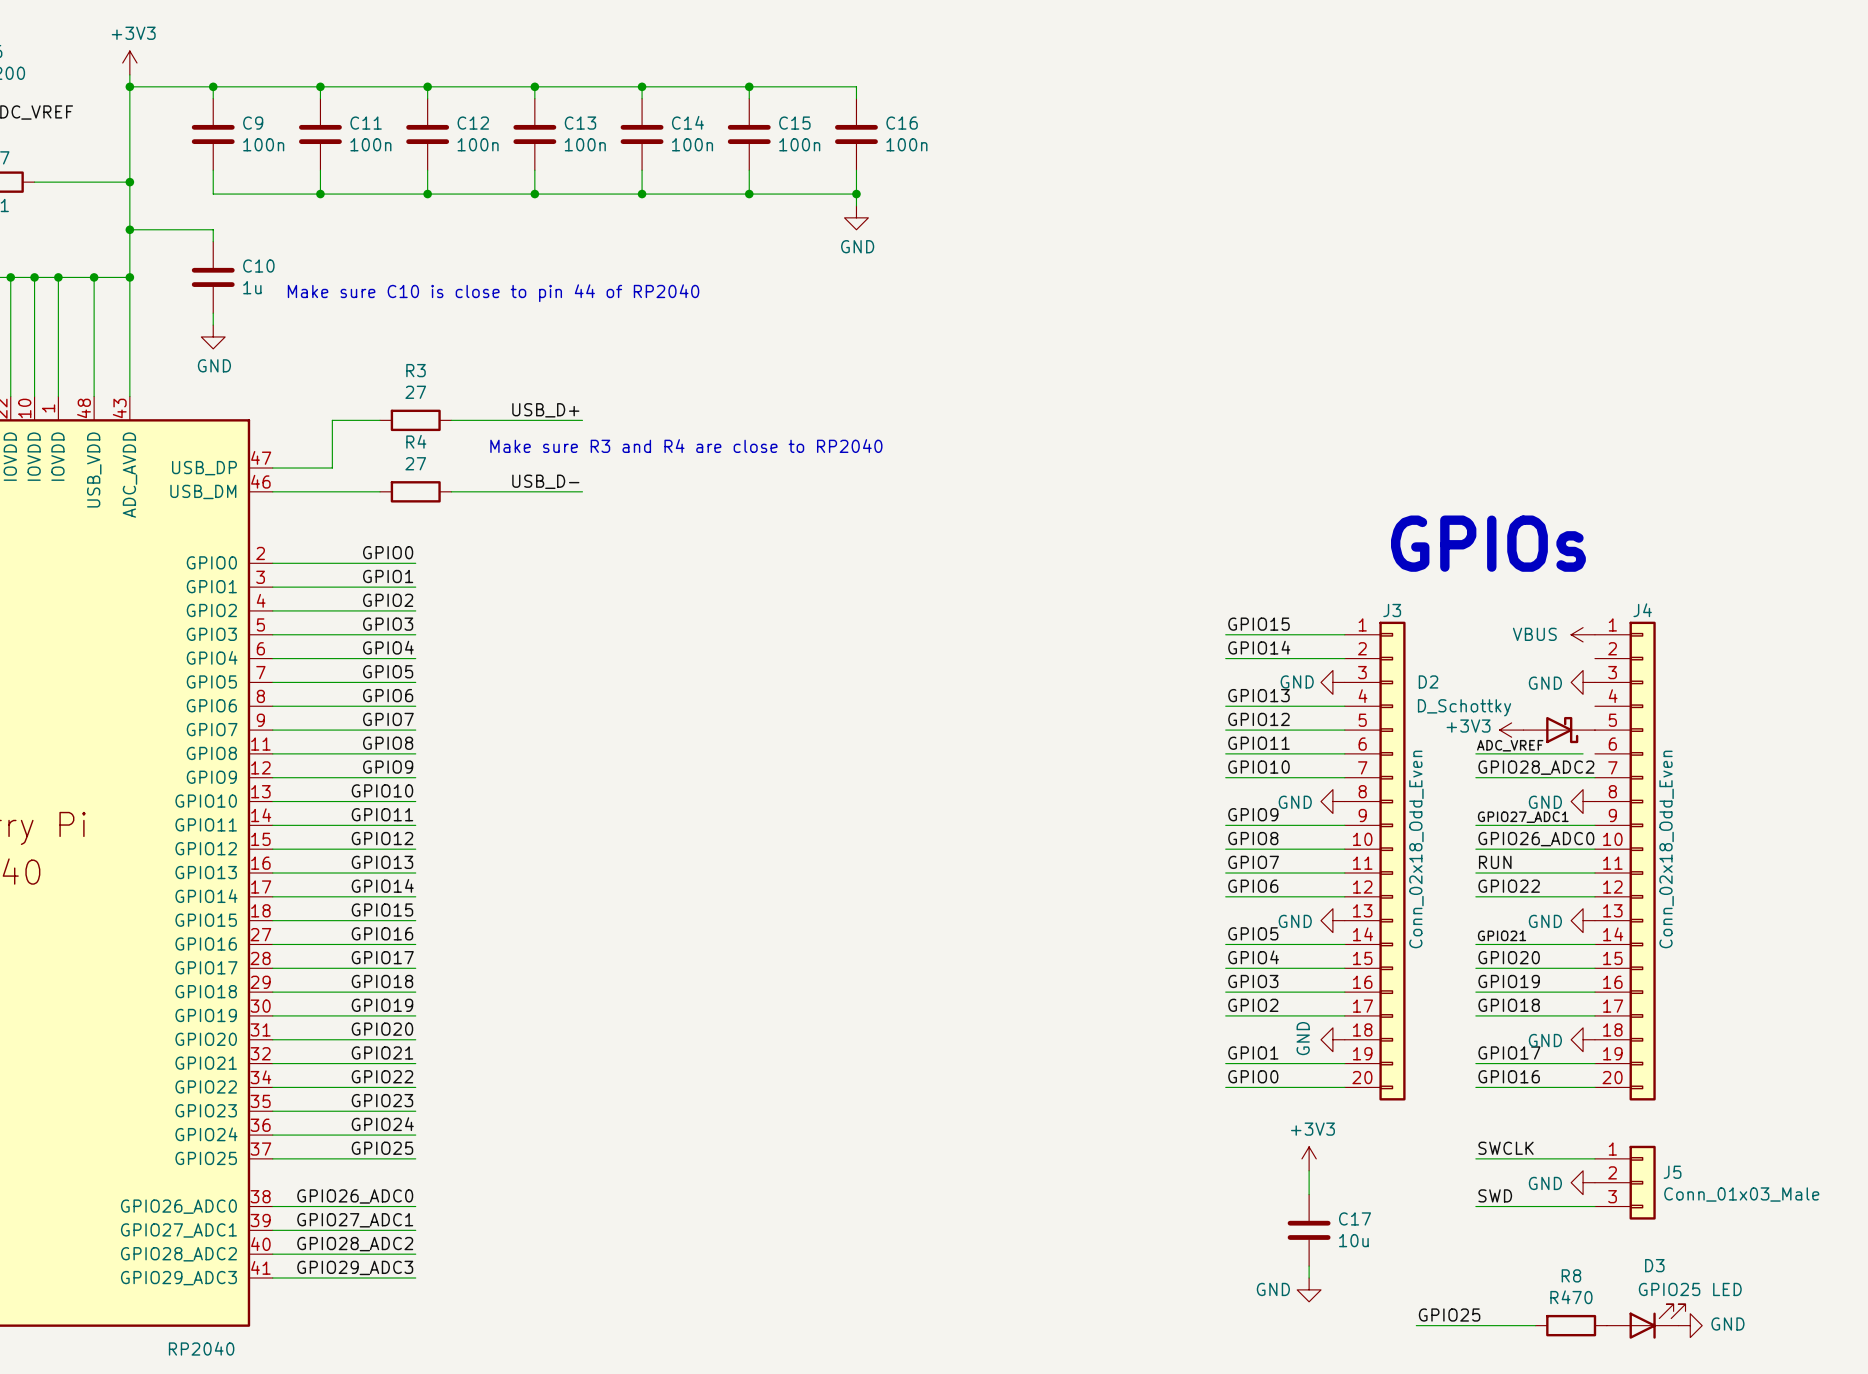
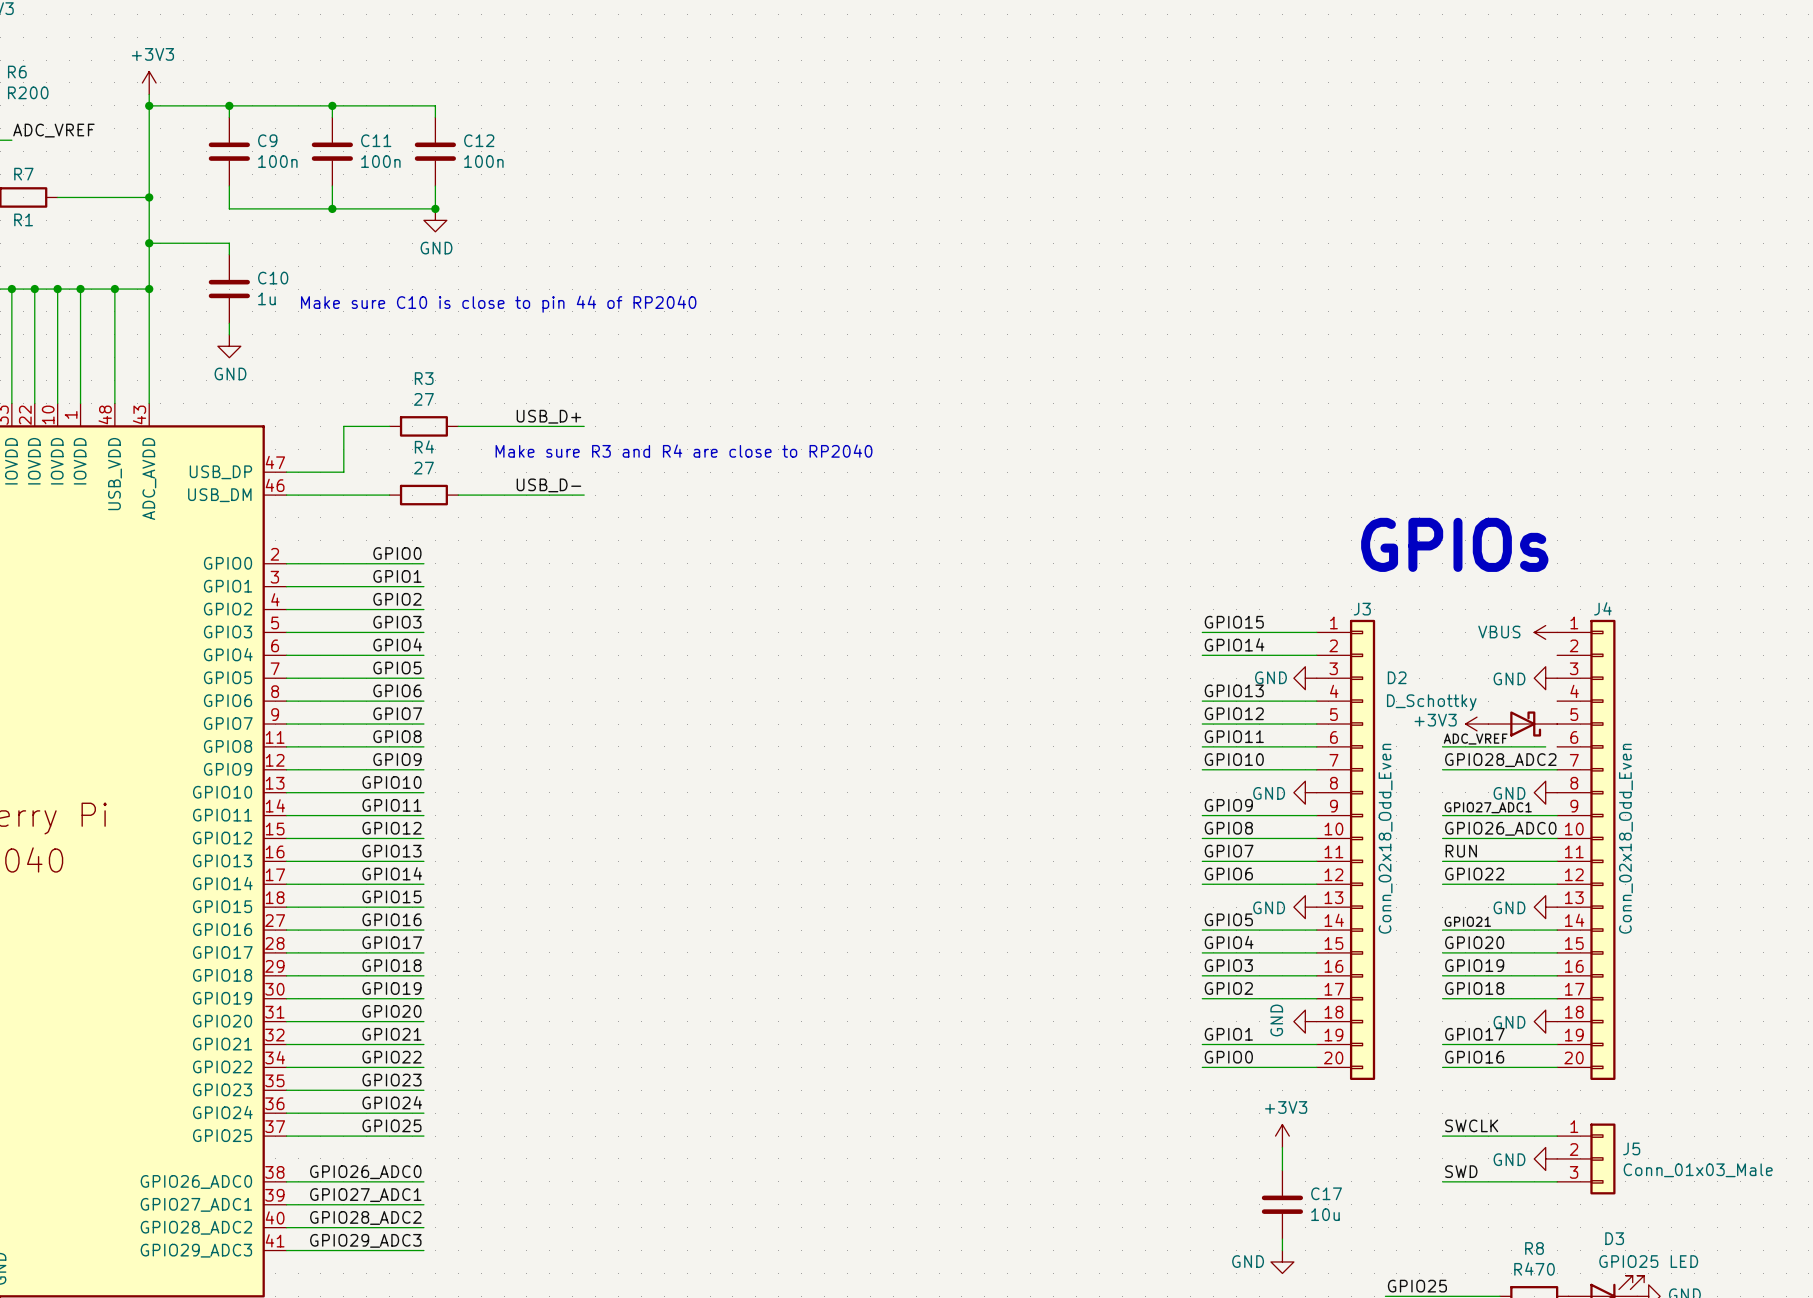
wire: (427, 86) (856, 86) (856, 98) -> none
junction: (427, 86) -> none
wire: (534, 86) (534, 98) -> none
junction: (534, 86) -> none
wire: (642, 86) (642, 98) -> none
junction: (642, 86) -> none
wire: (749, 86) (749, 98) -> none
junction: (749, 86) -> none
C13: 100n (534, 134) -> none
C14: 100n (642, 134) -> none
C15: 100n (749, 134) -> none
C16: 100n (856, 134) -> none
wire: (534, 170) (534, 194) -> none
wire: (642, 170) (642, 194) -> none
wire: (749, 170) (749, 194) -> none
wire: (856, 170) (856, 205) -> none
wire: (427, 194) (856, 194) -> none
junction: (534, 194) -> none
junction: (642, 194) -> none
junction: (749, 194) -> none
junction: (856, 194) -> none
power symbol: none -> GND (435, 220)
power symbol: GND (856, 217) -> none

